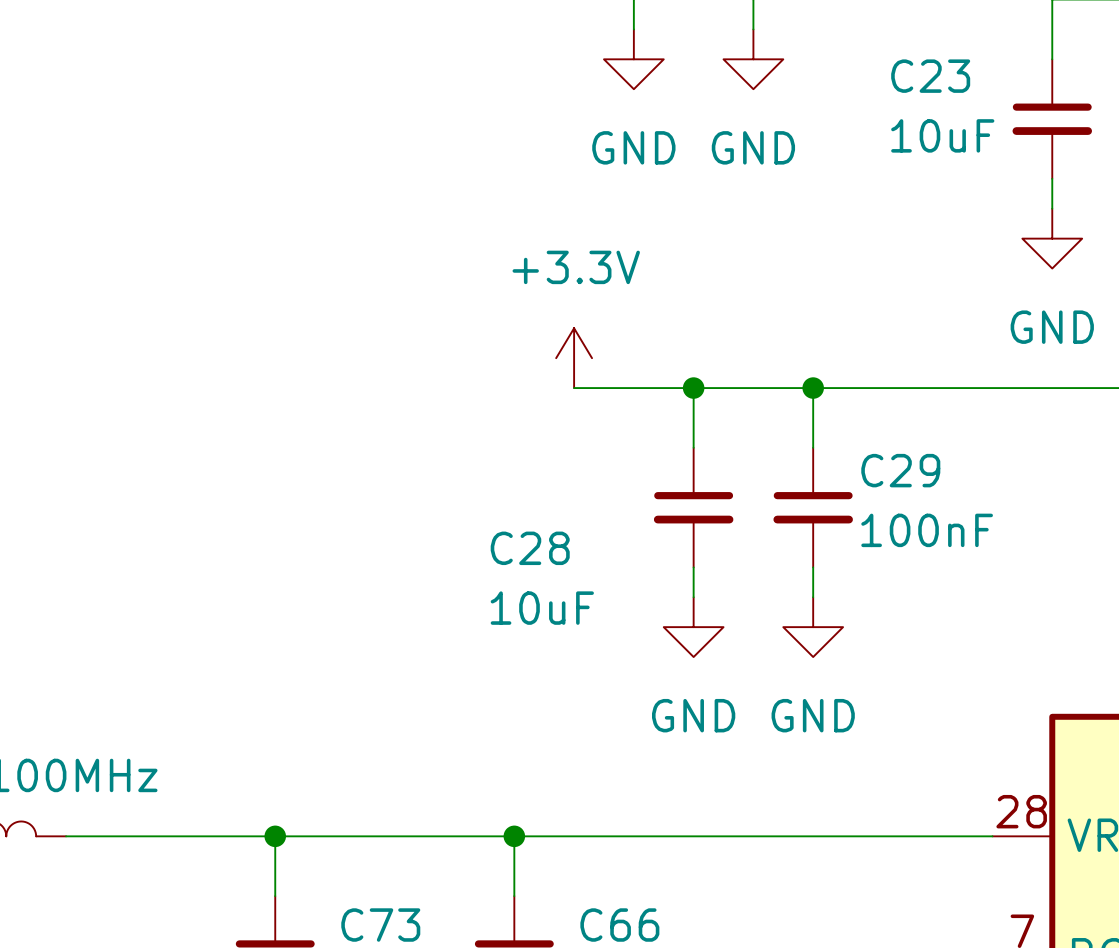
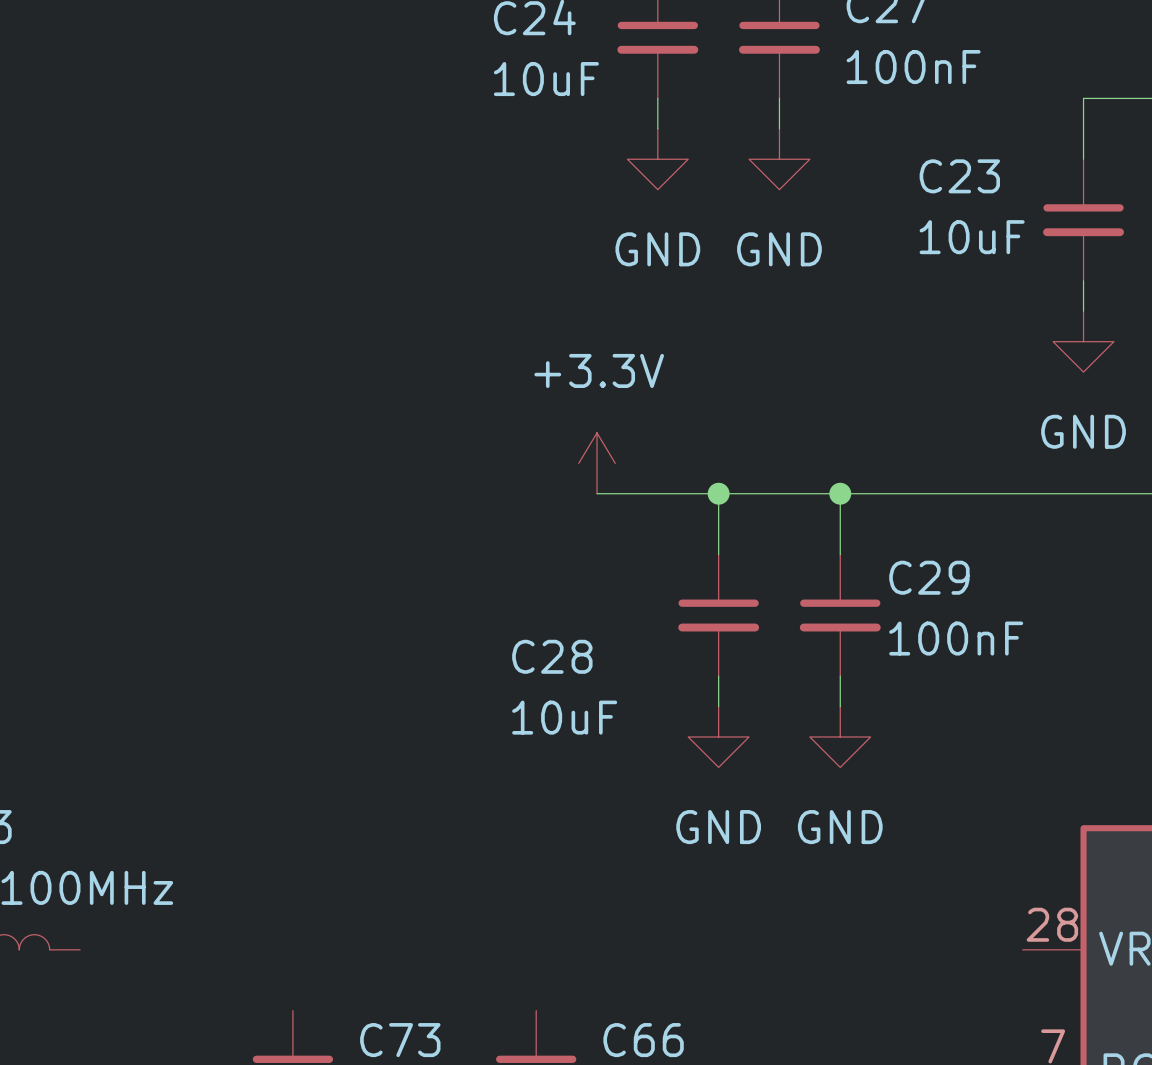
wire: (66, 836) (992, 836) -> none
wire: (275, 836) (275, 896) -> none
junction: (275, 836) -> none
wire: (514, 836) (514, 896) -> none
junction: (514, 836) -> none

